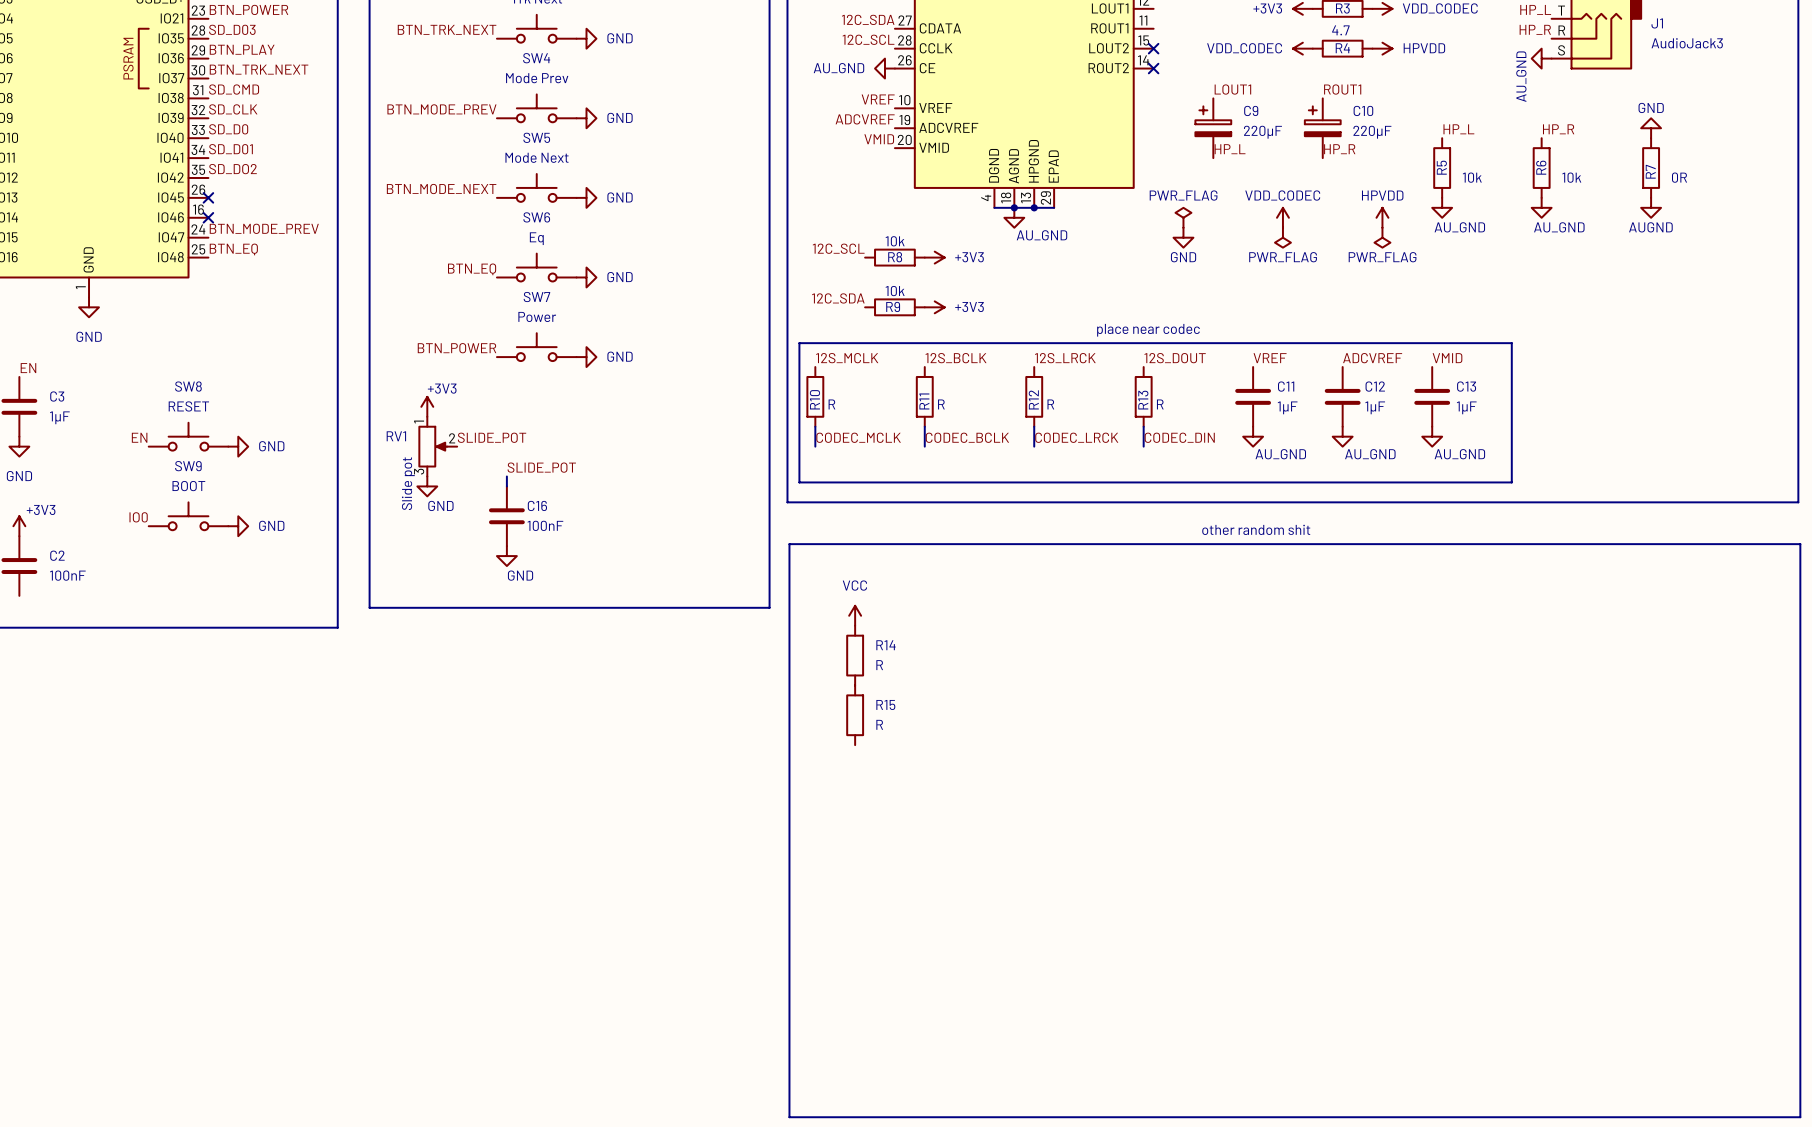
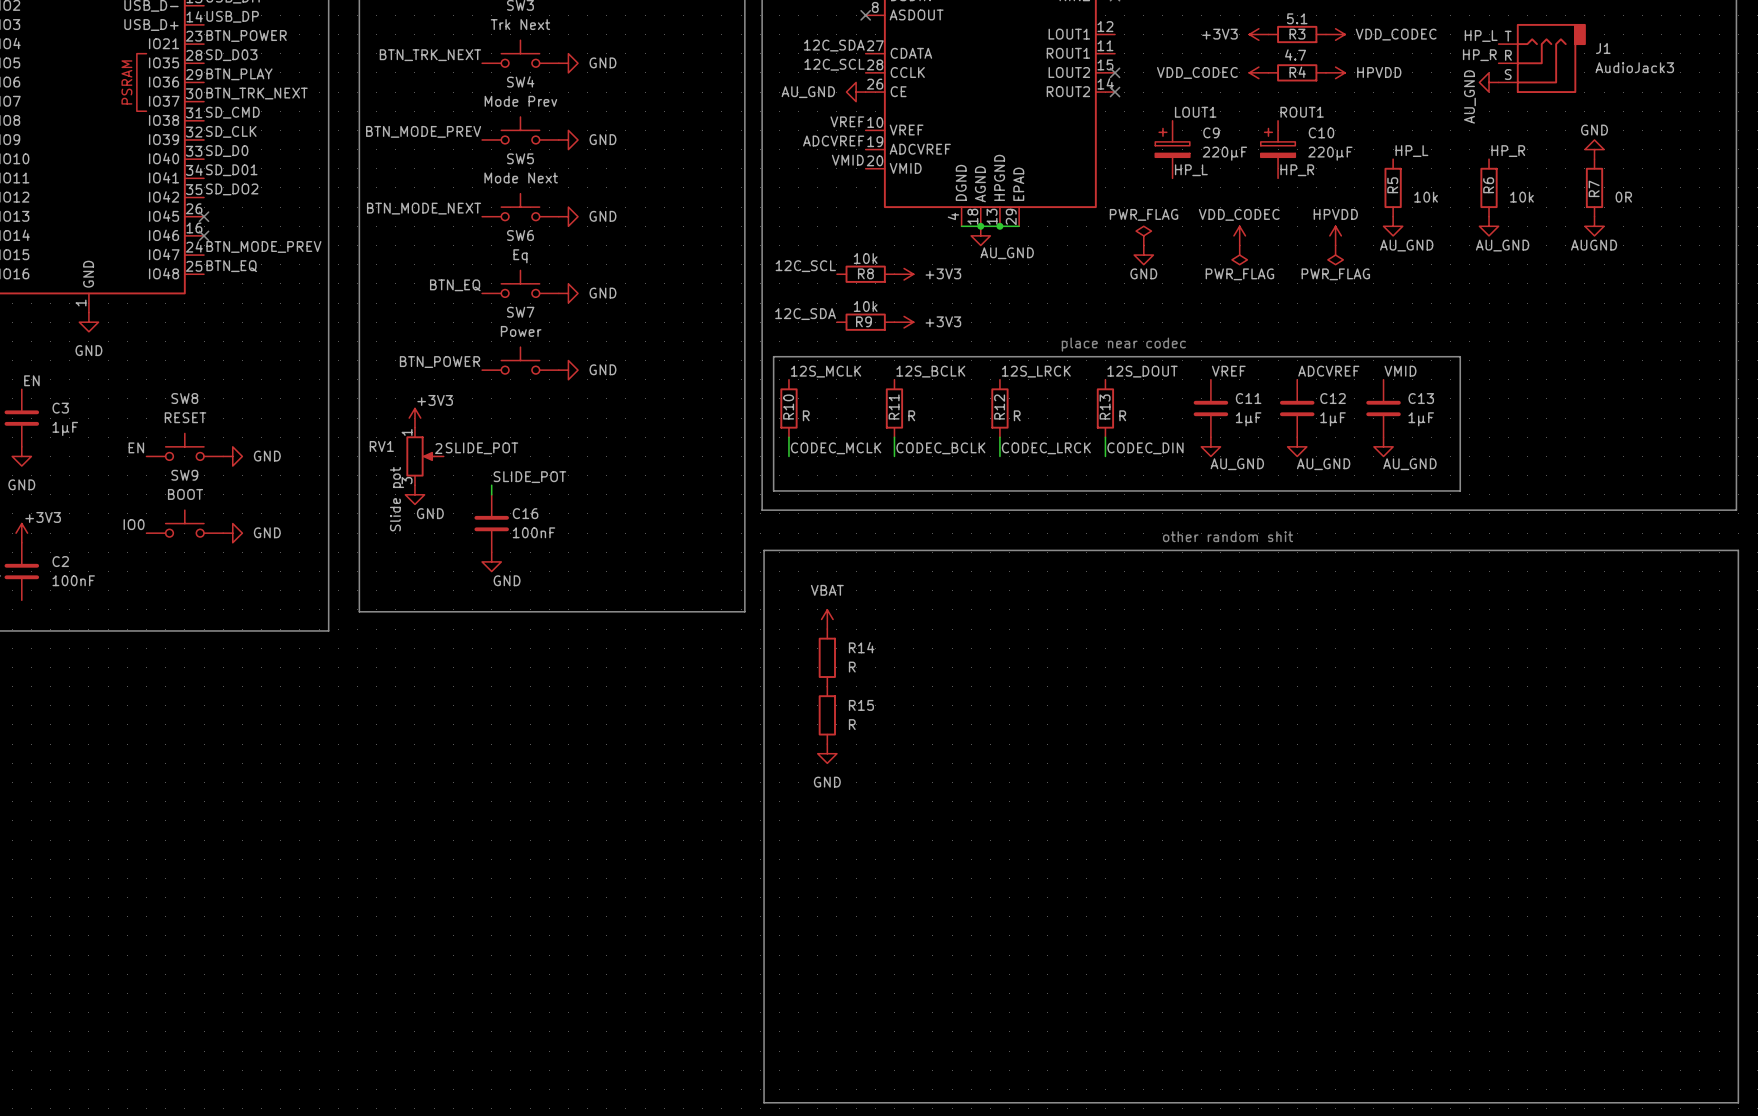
power symbol: VCC (855, 615) -> VBAT (827, 619)
power symbol: none -> GND (827, 753)

